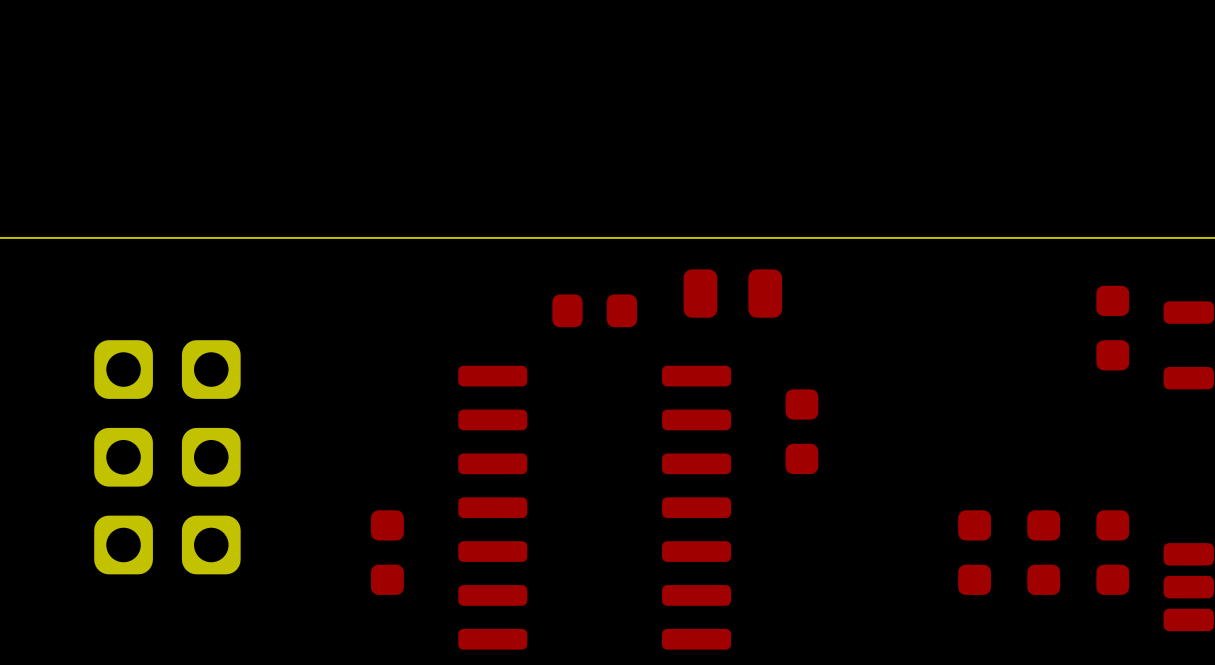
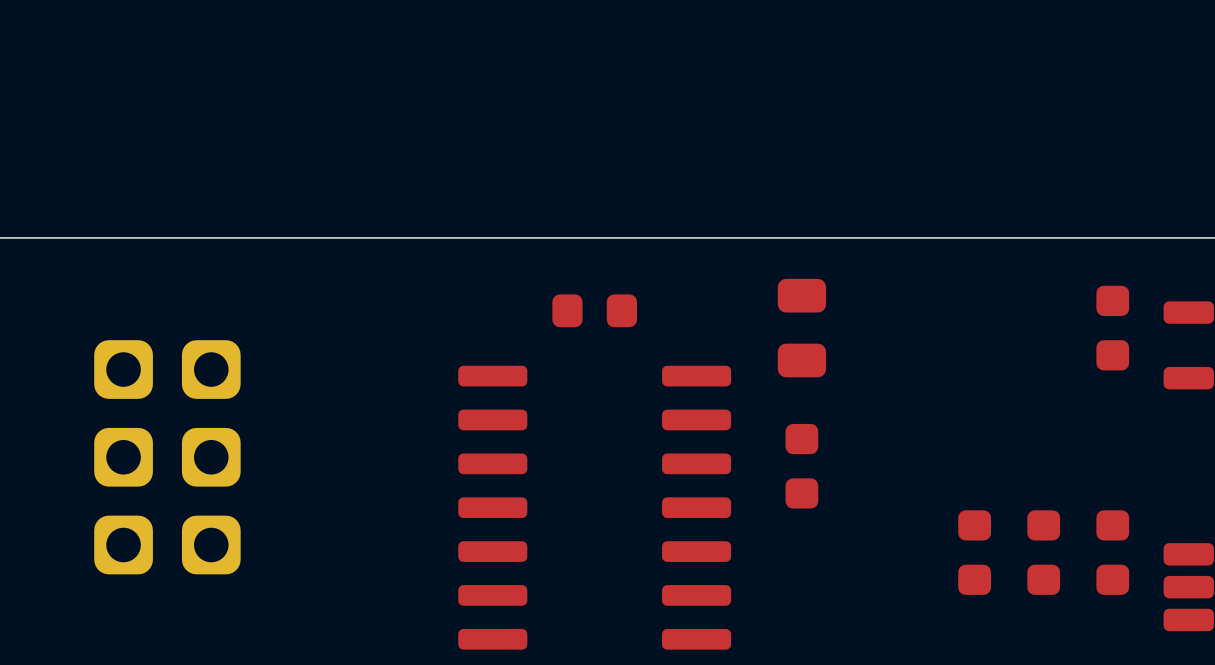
part rotation: 0° (732, 293) -> 90° clockwise (801, 328)
part position: (732, 293) -> (801, 328)
part position: (801, 431) -> (801, 466)
part: (387, 552) -> none

